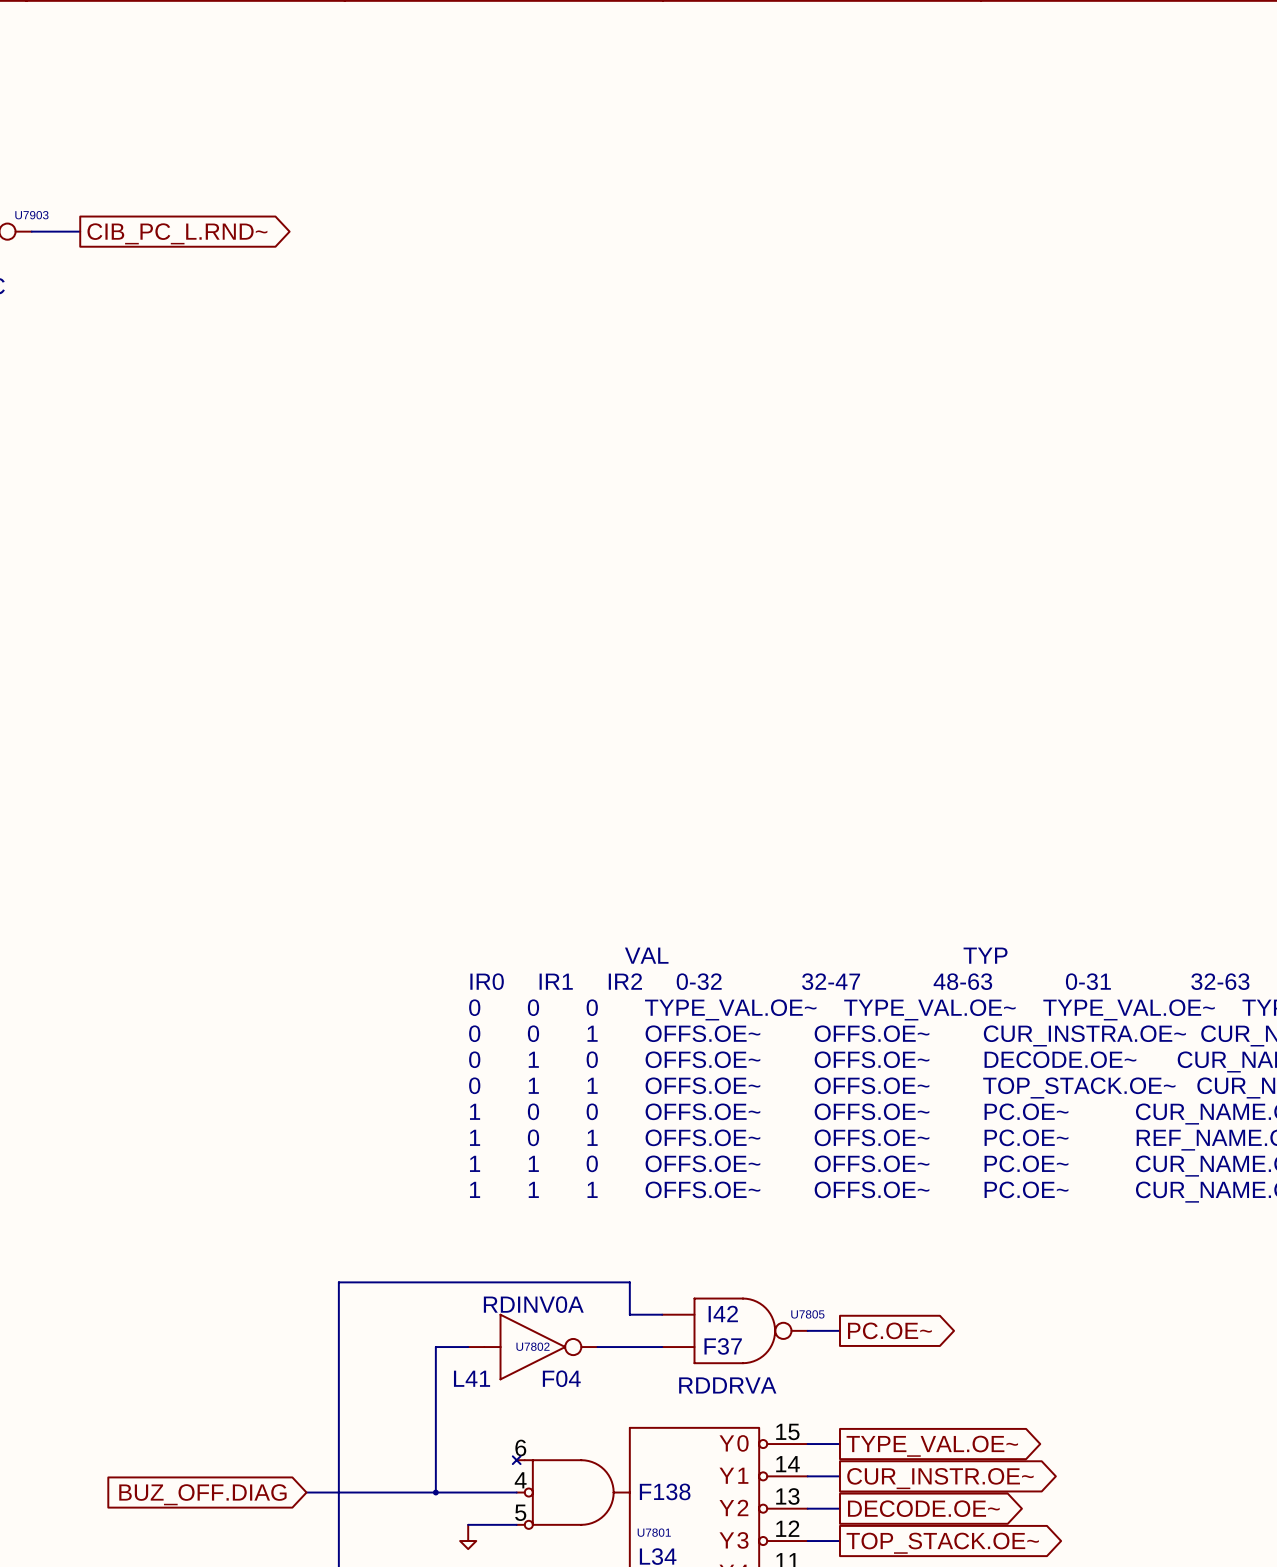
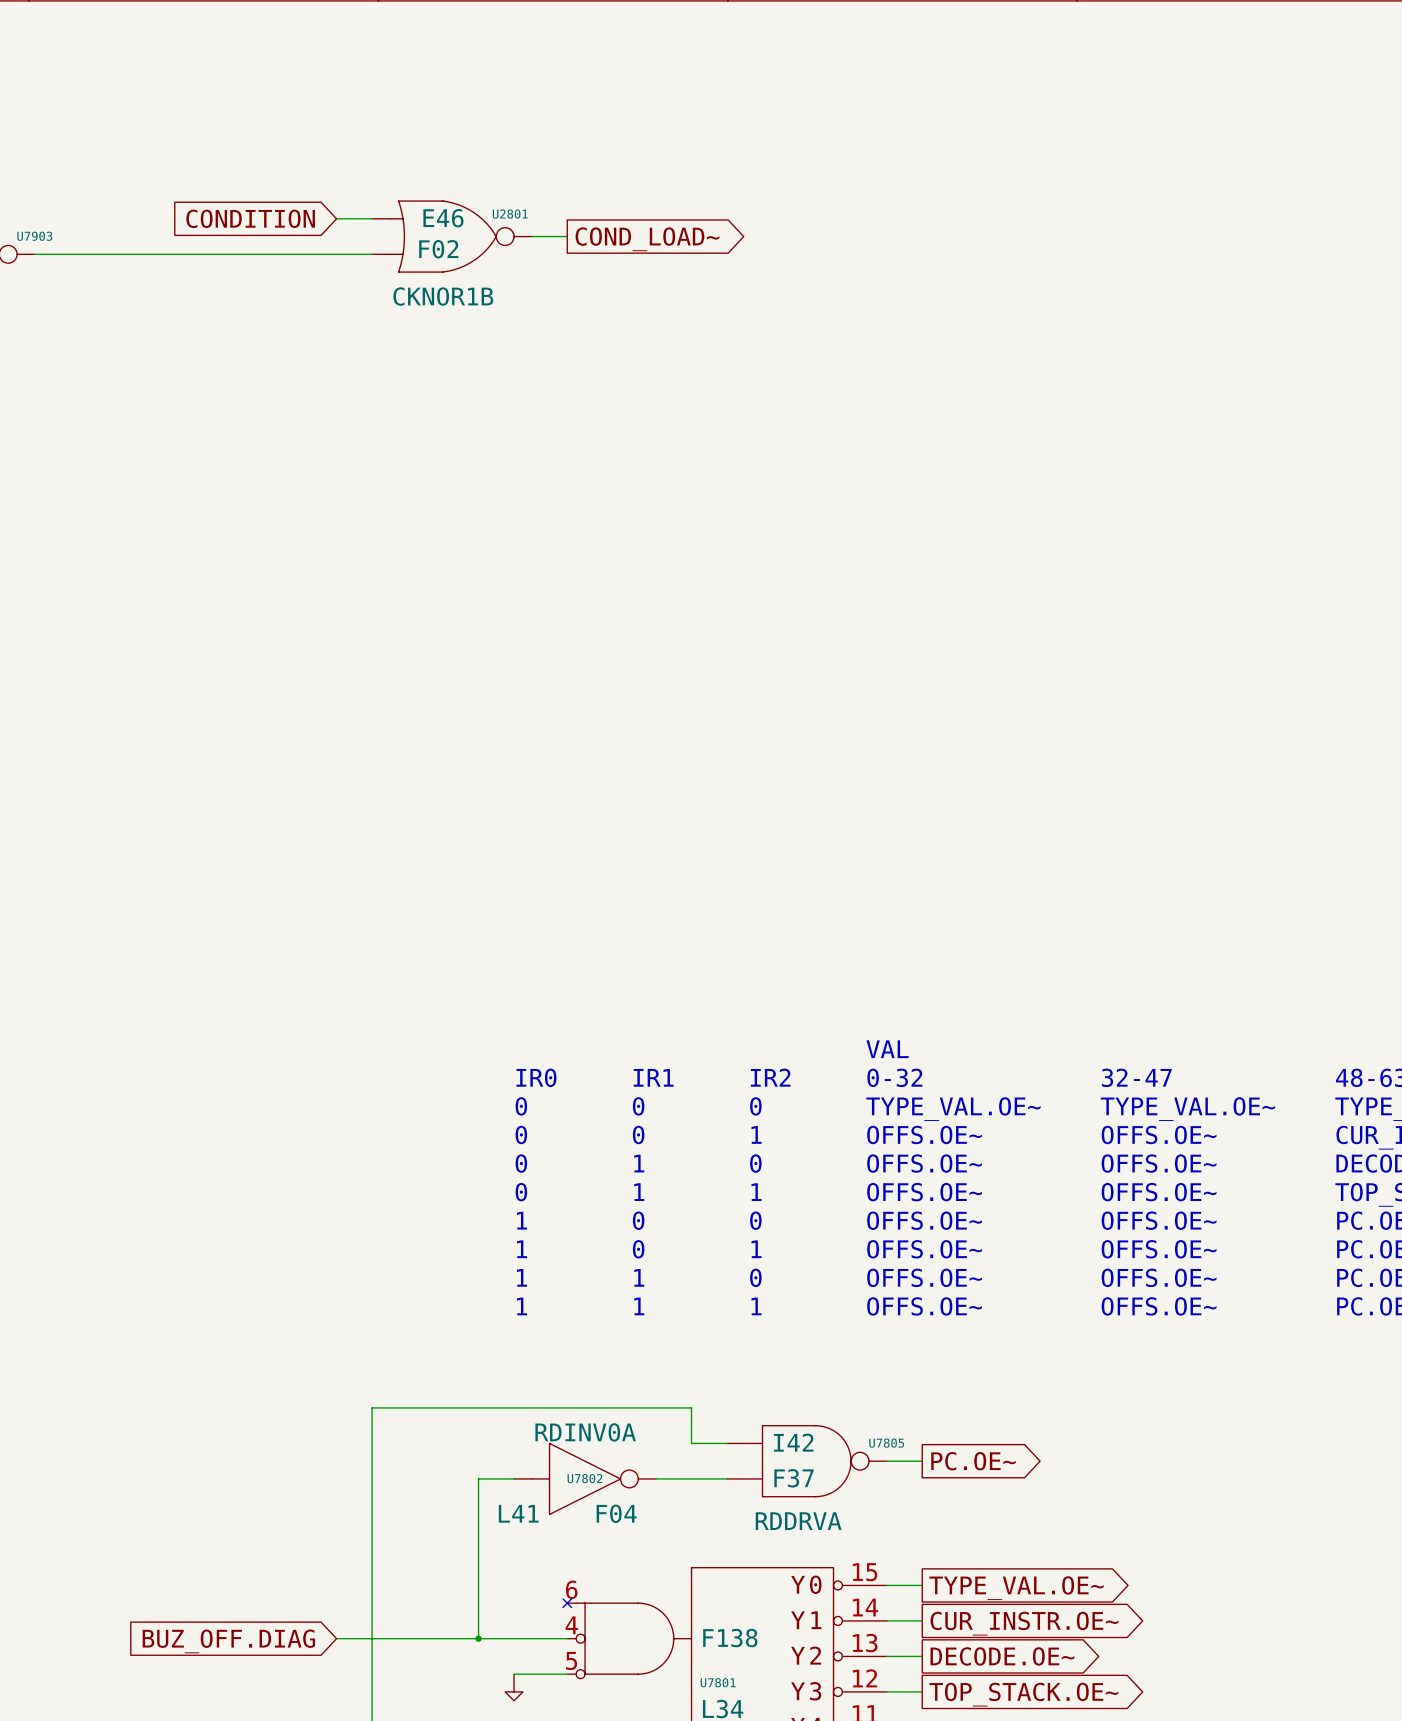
global label: none -> CONDITION (250, 218)
wire: none -> (336, 218) (372, 218)
U2801: none -> F02 (451, 236)
wire: none -> (531, 236) (567, 236)
global label: none -> COND_LOAD~ (647, 239)
wire: none -> (88, 254) (372, 254)
global label: CIB_PC_L.RND~ (177, 233) -> none

